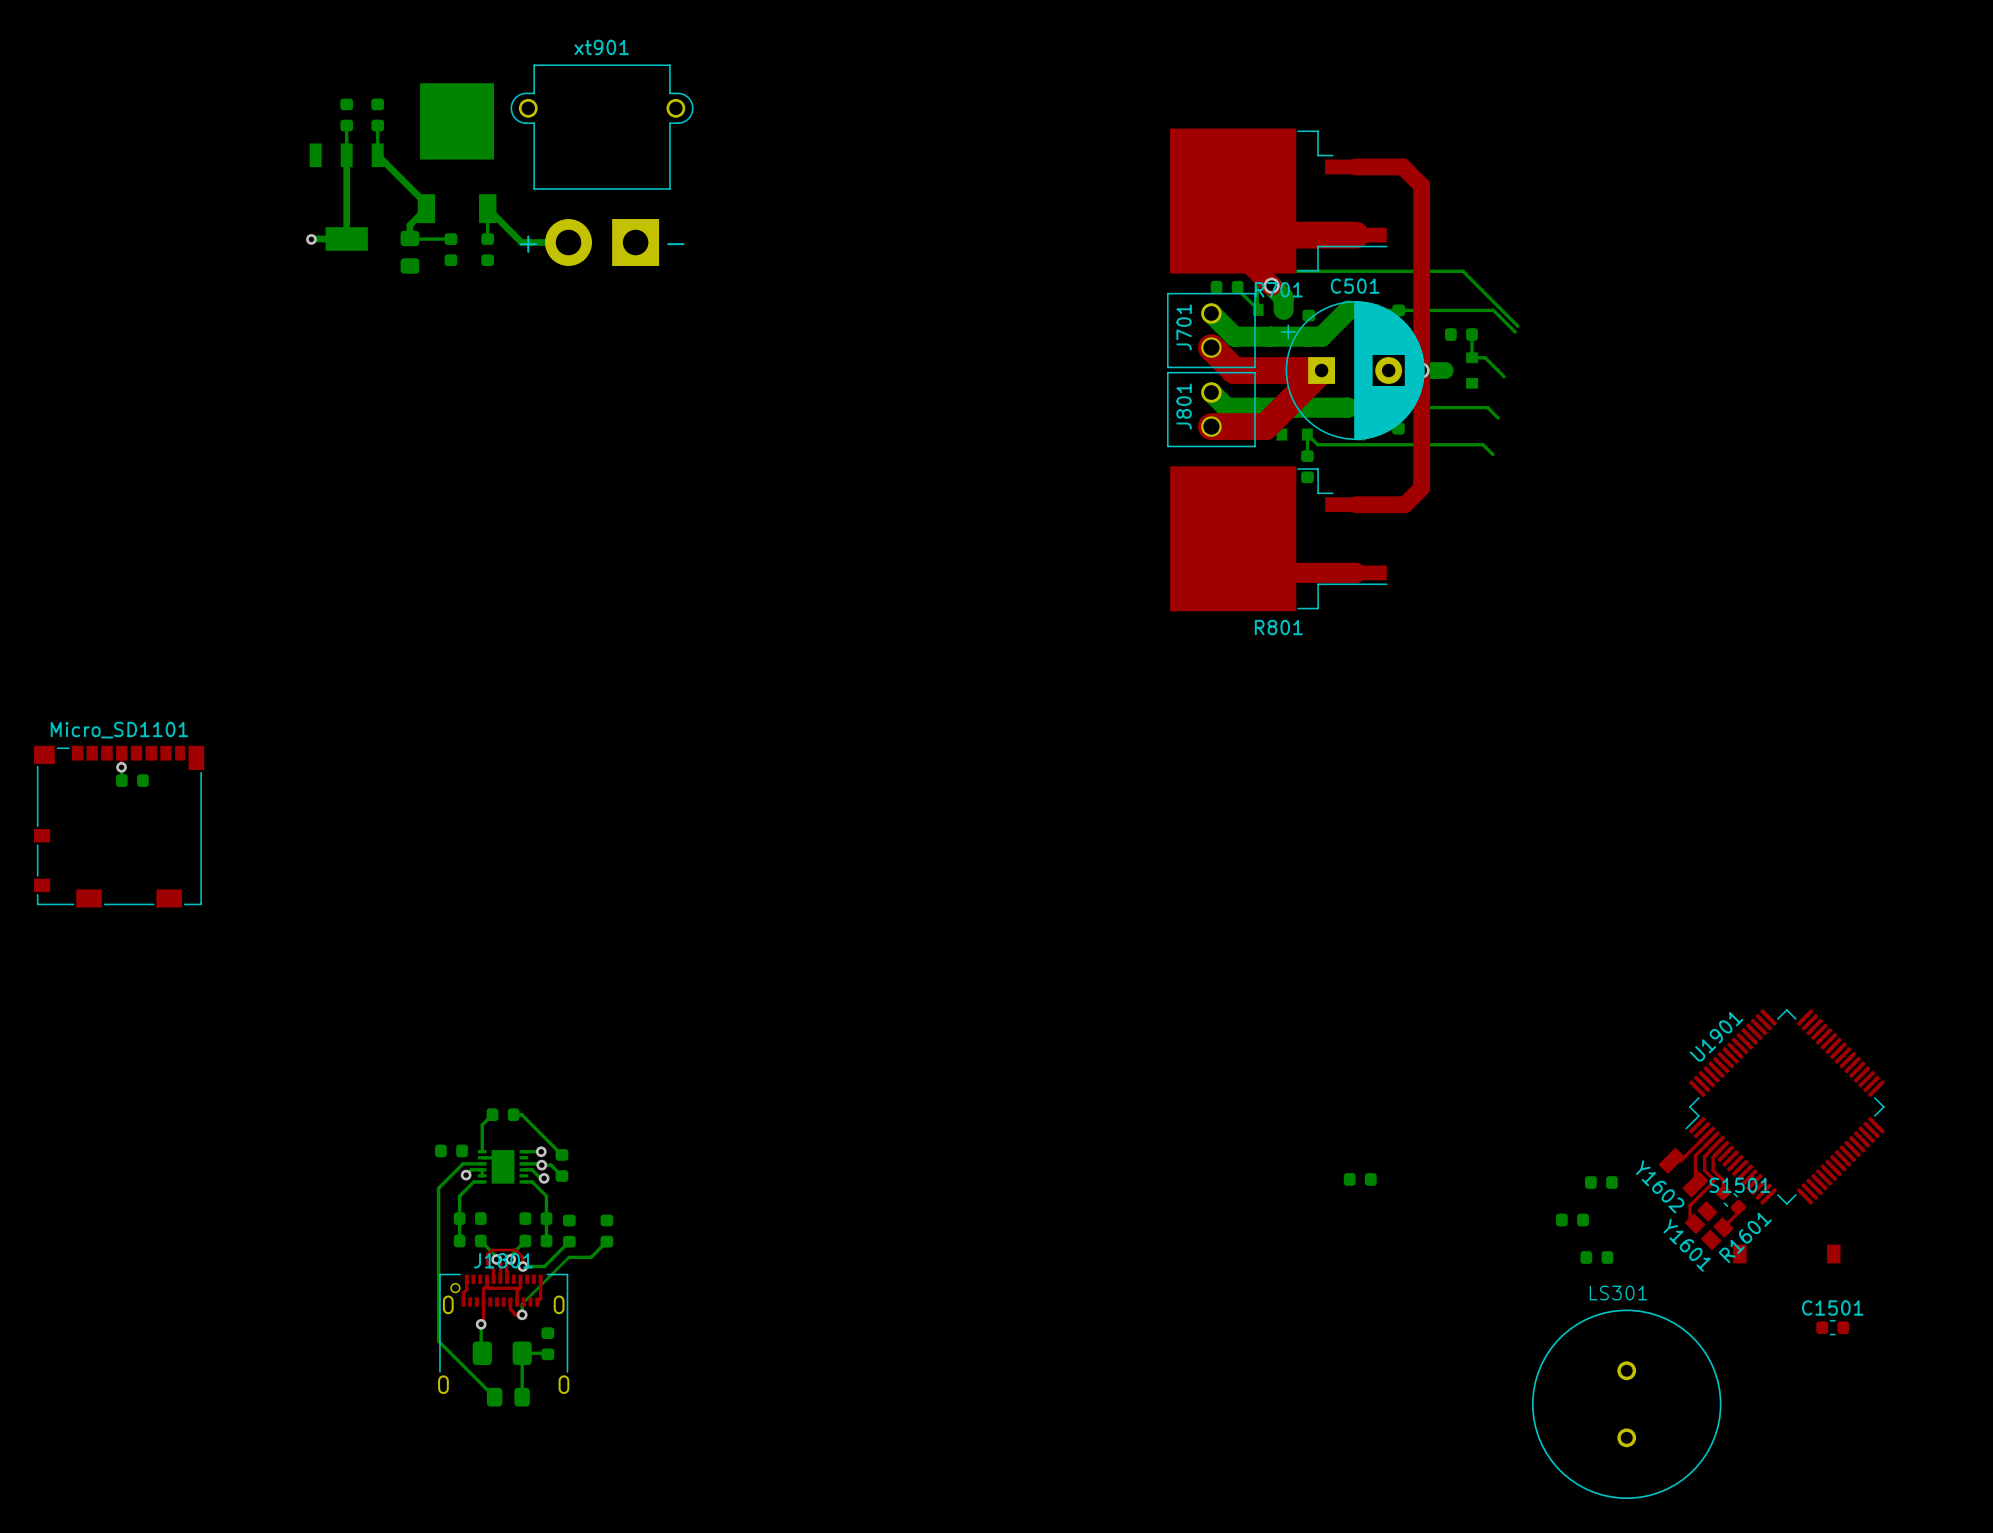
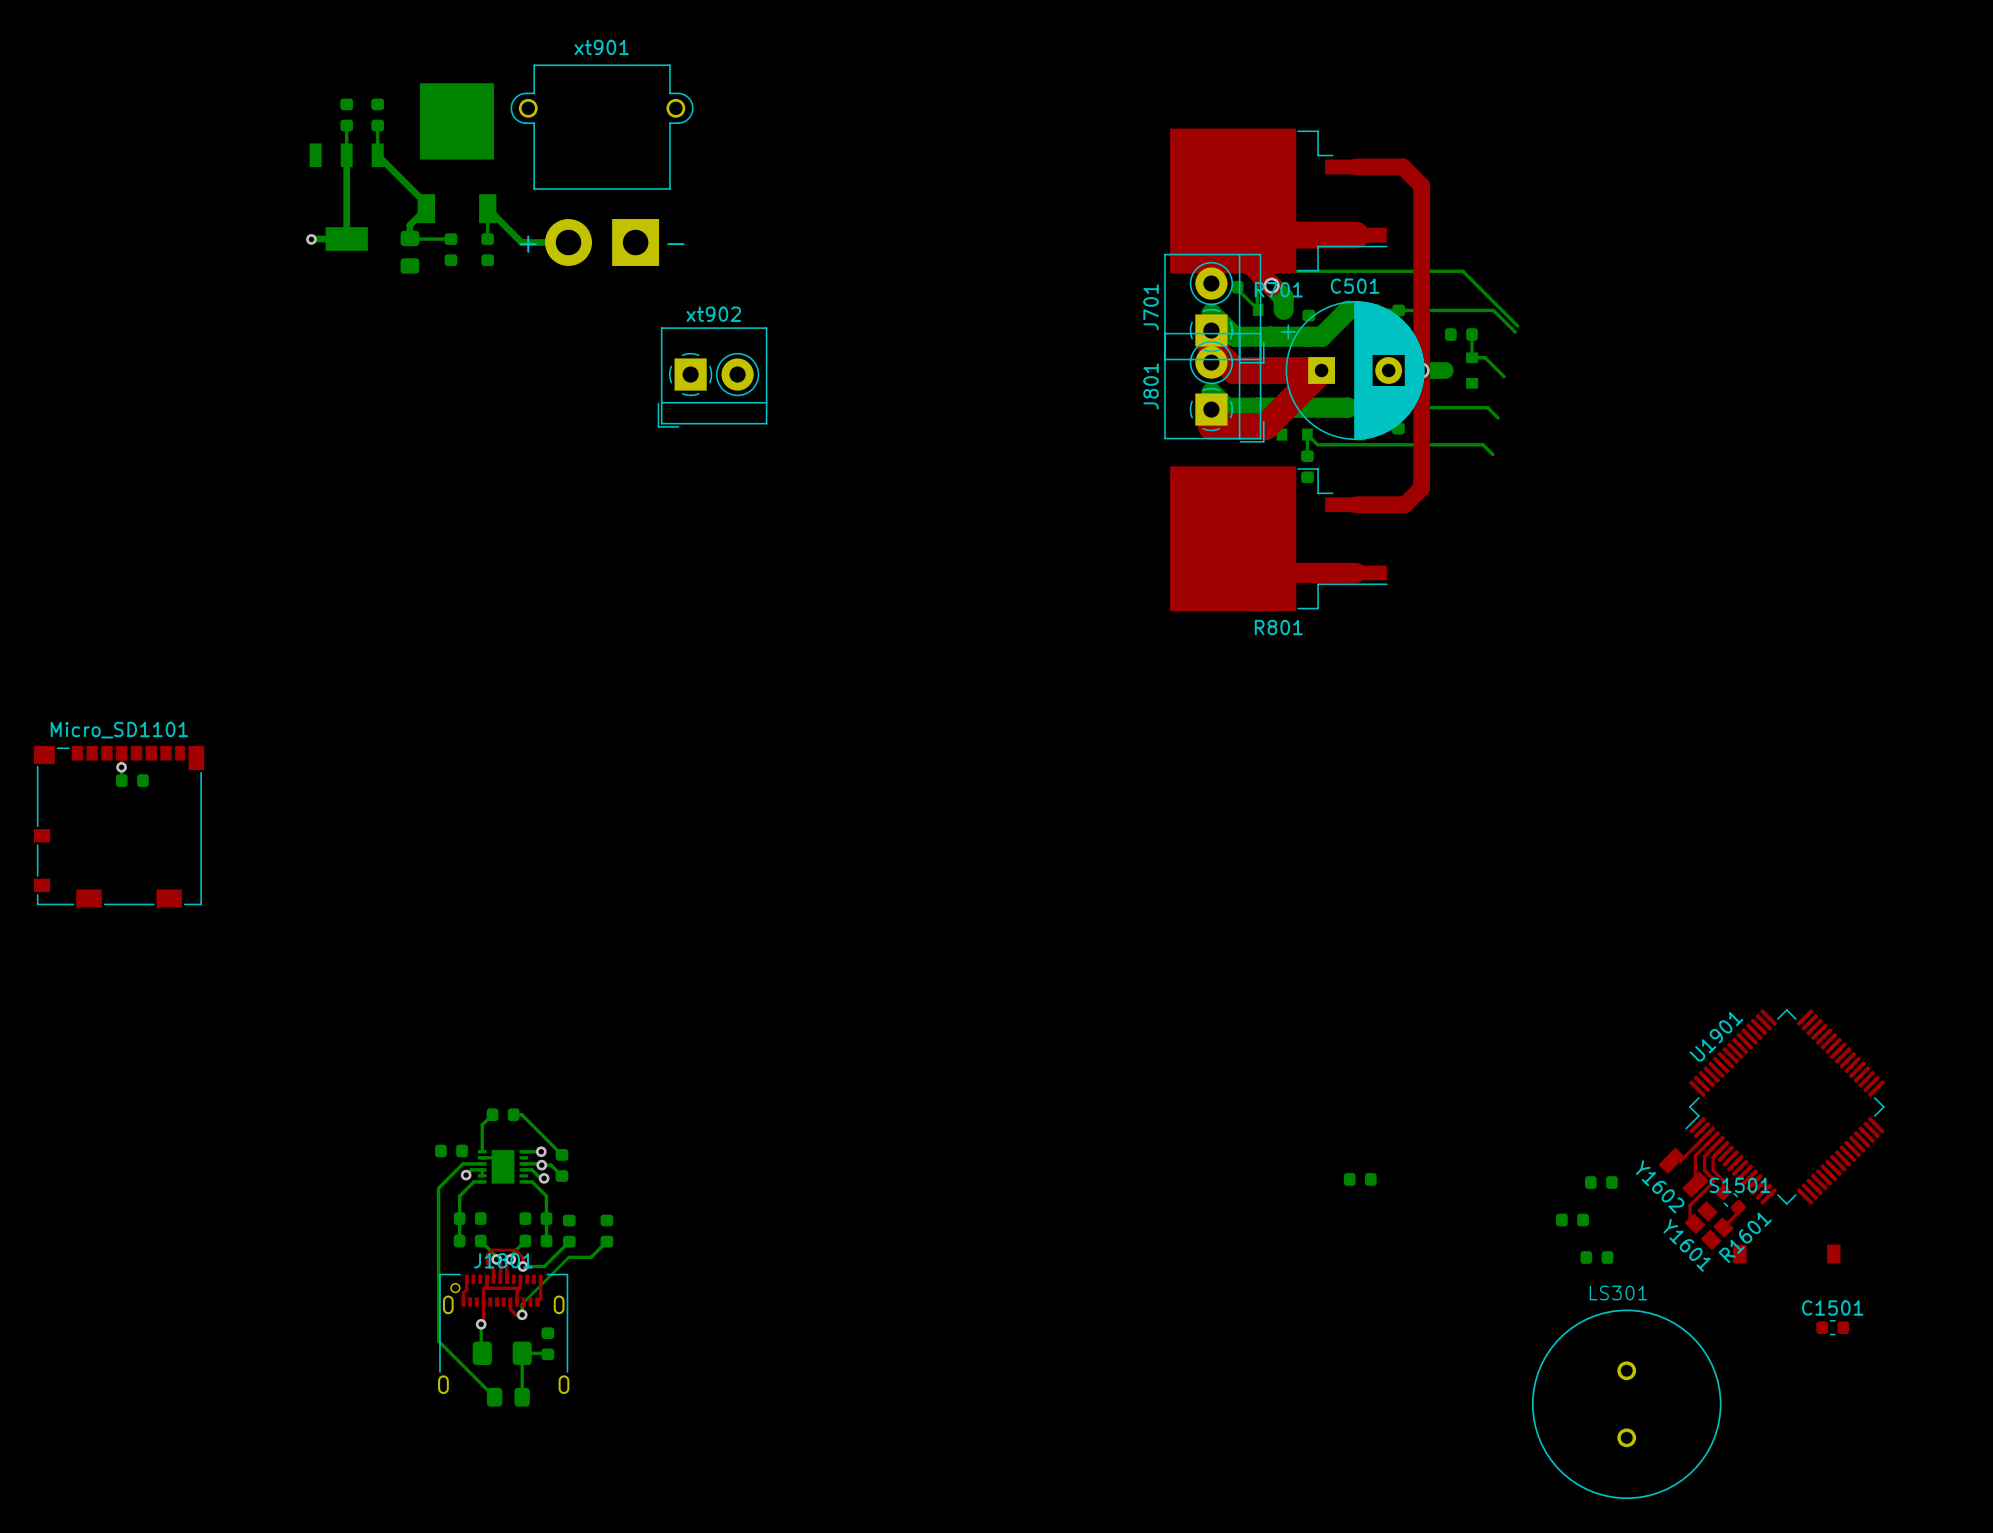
J701 footprint: [1166, 292, 1256, 369] -> [1164, 253, 1265, 364]
J701 name position: J701 (1184, 327) -> J701 (1151, 307)
J801 footprint: [1166, 371, 1256, 448] -> [1164, 332, 1265, 443]
xt902: none -> (712, 377)
J801 name position: J801 (1184, 406) -> J801 (1151, 386)

